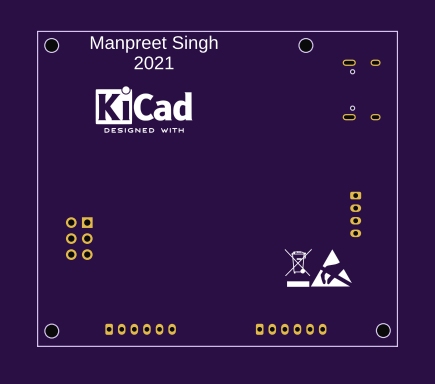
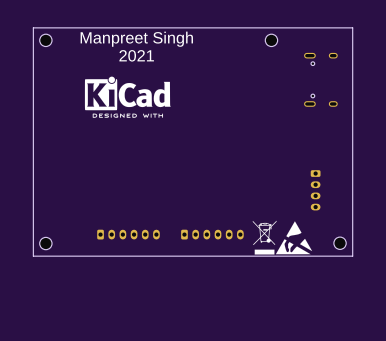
part: (79, 238) -> none
part: none -> (128, 234)
part: none -> (212, 234)
board edge: (397, 288) (397, 346) (37, 346) (37, 288) -> (352, 256) (33, 256)
part: (140, 329) -> none
part: (291, 329) -> none
part position: (383, 330) -> (340, 243)
part position: (51, 331) -> (45, 243)

